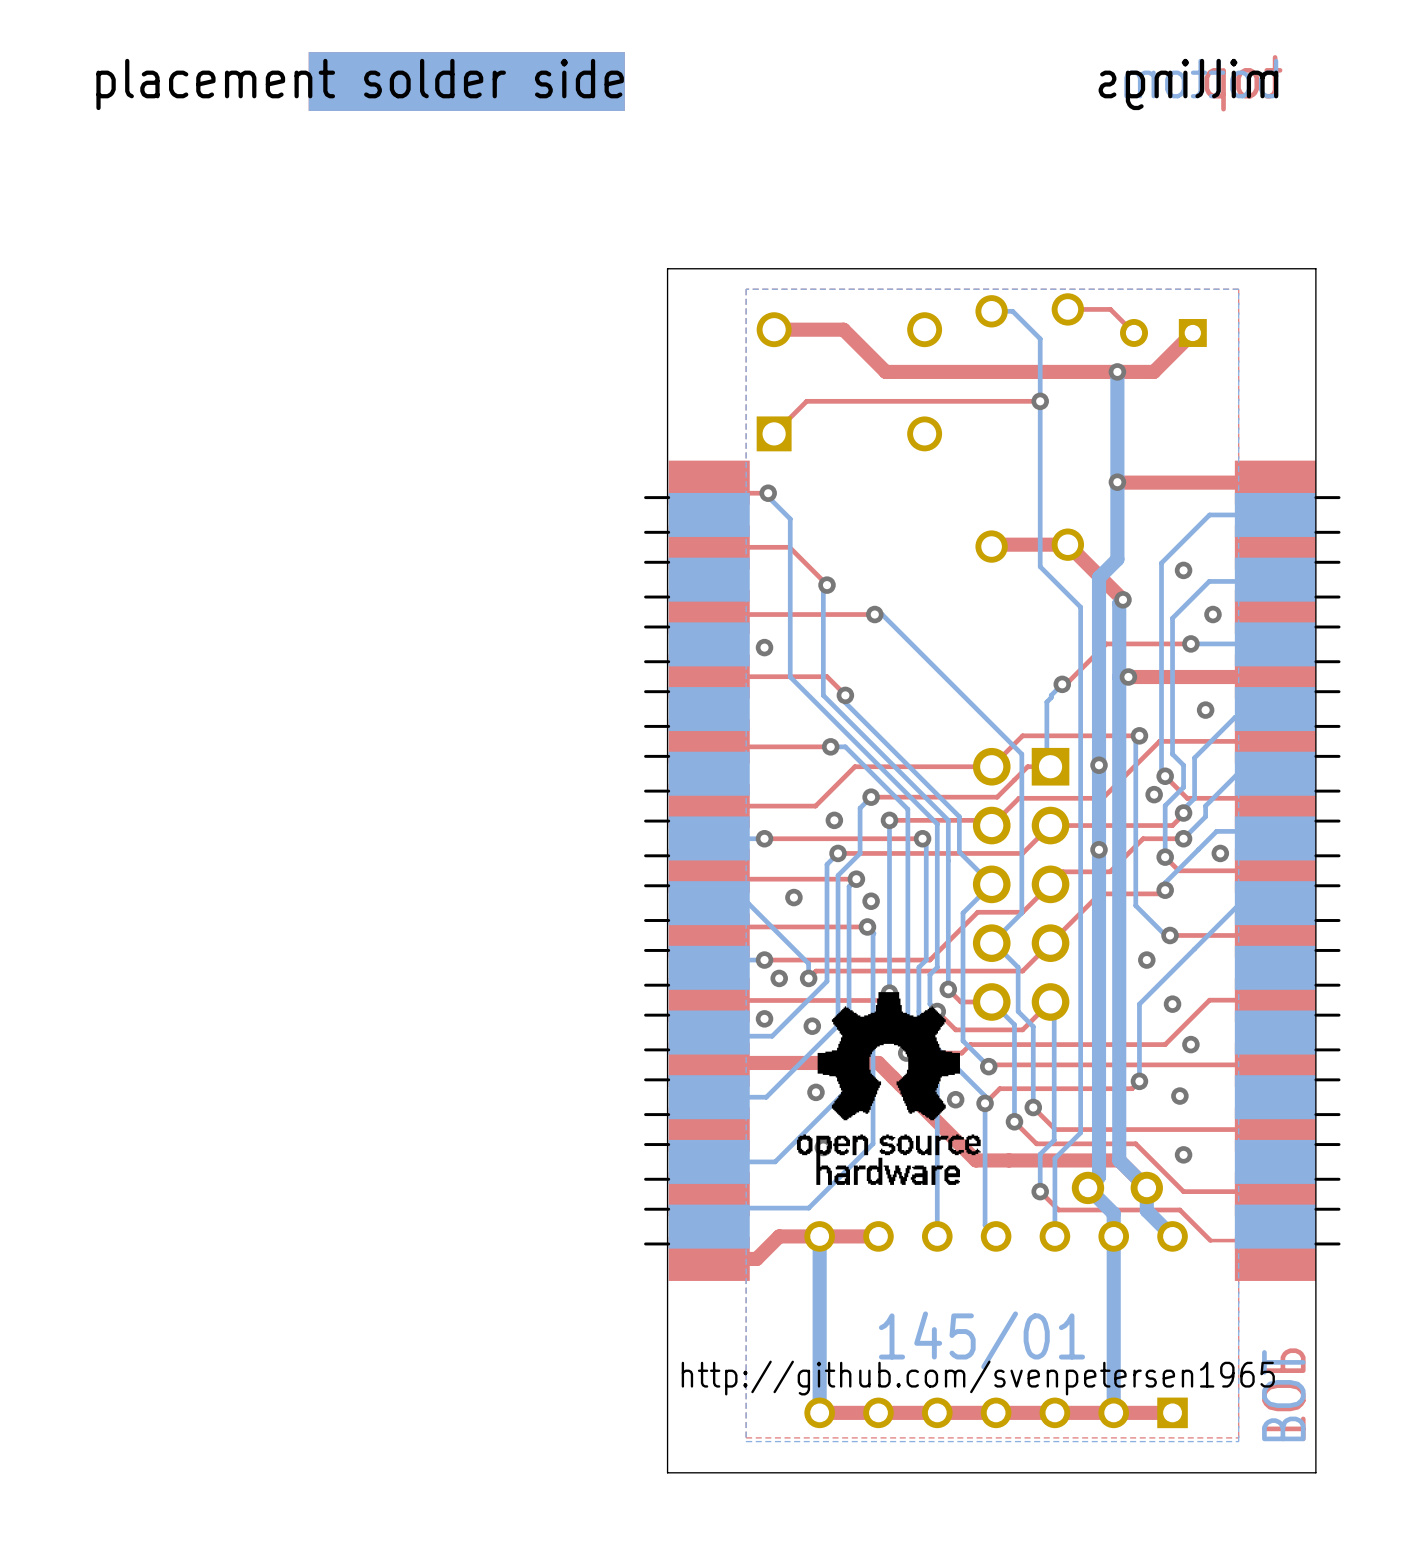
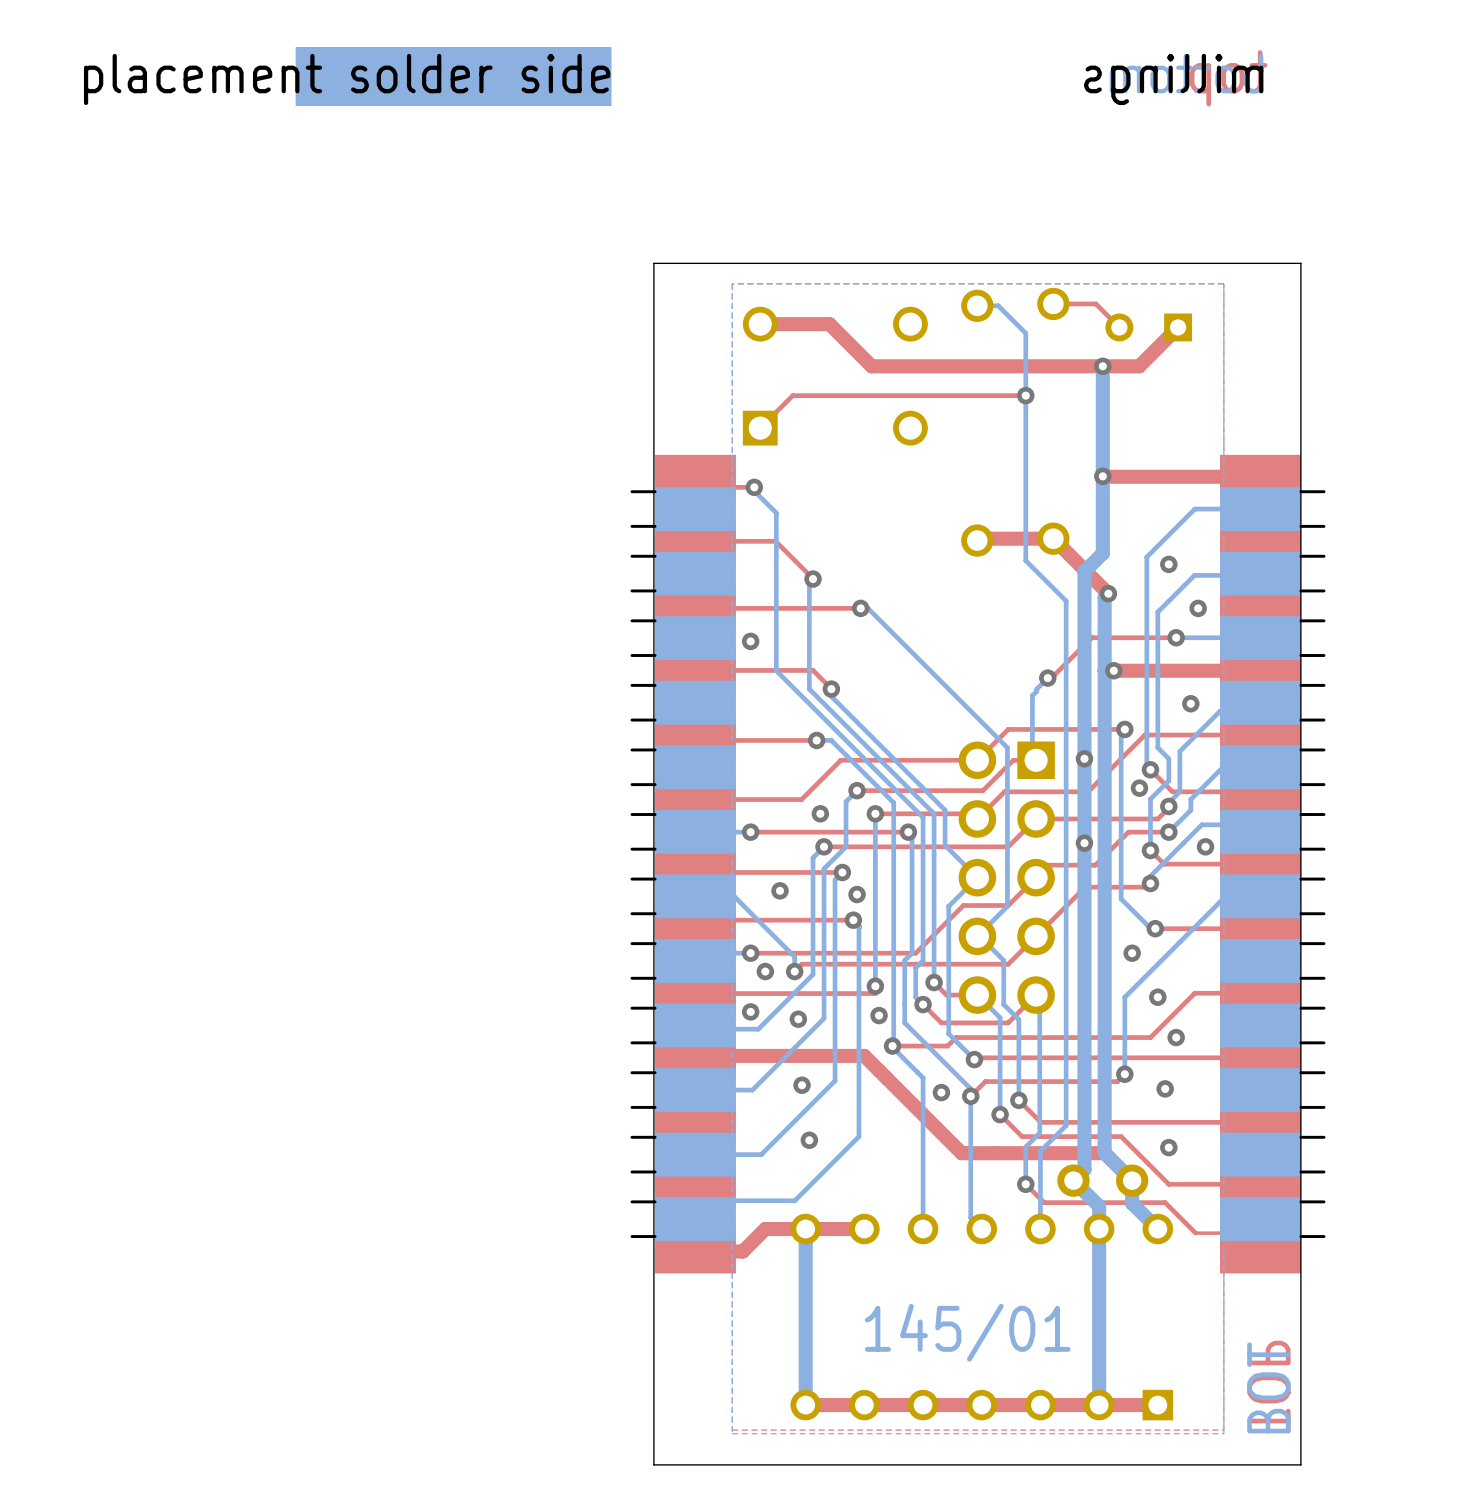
drawing: [796, 992, 981, 1185] -> none
text: http://github.com/svenpetersen1965 (978, 1378) -> none

